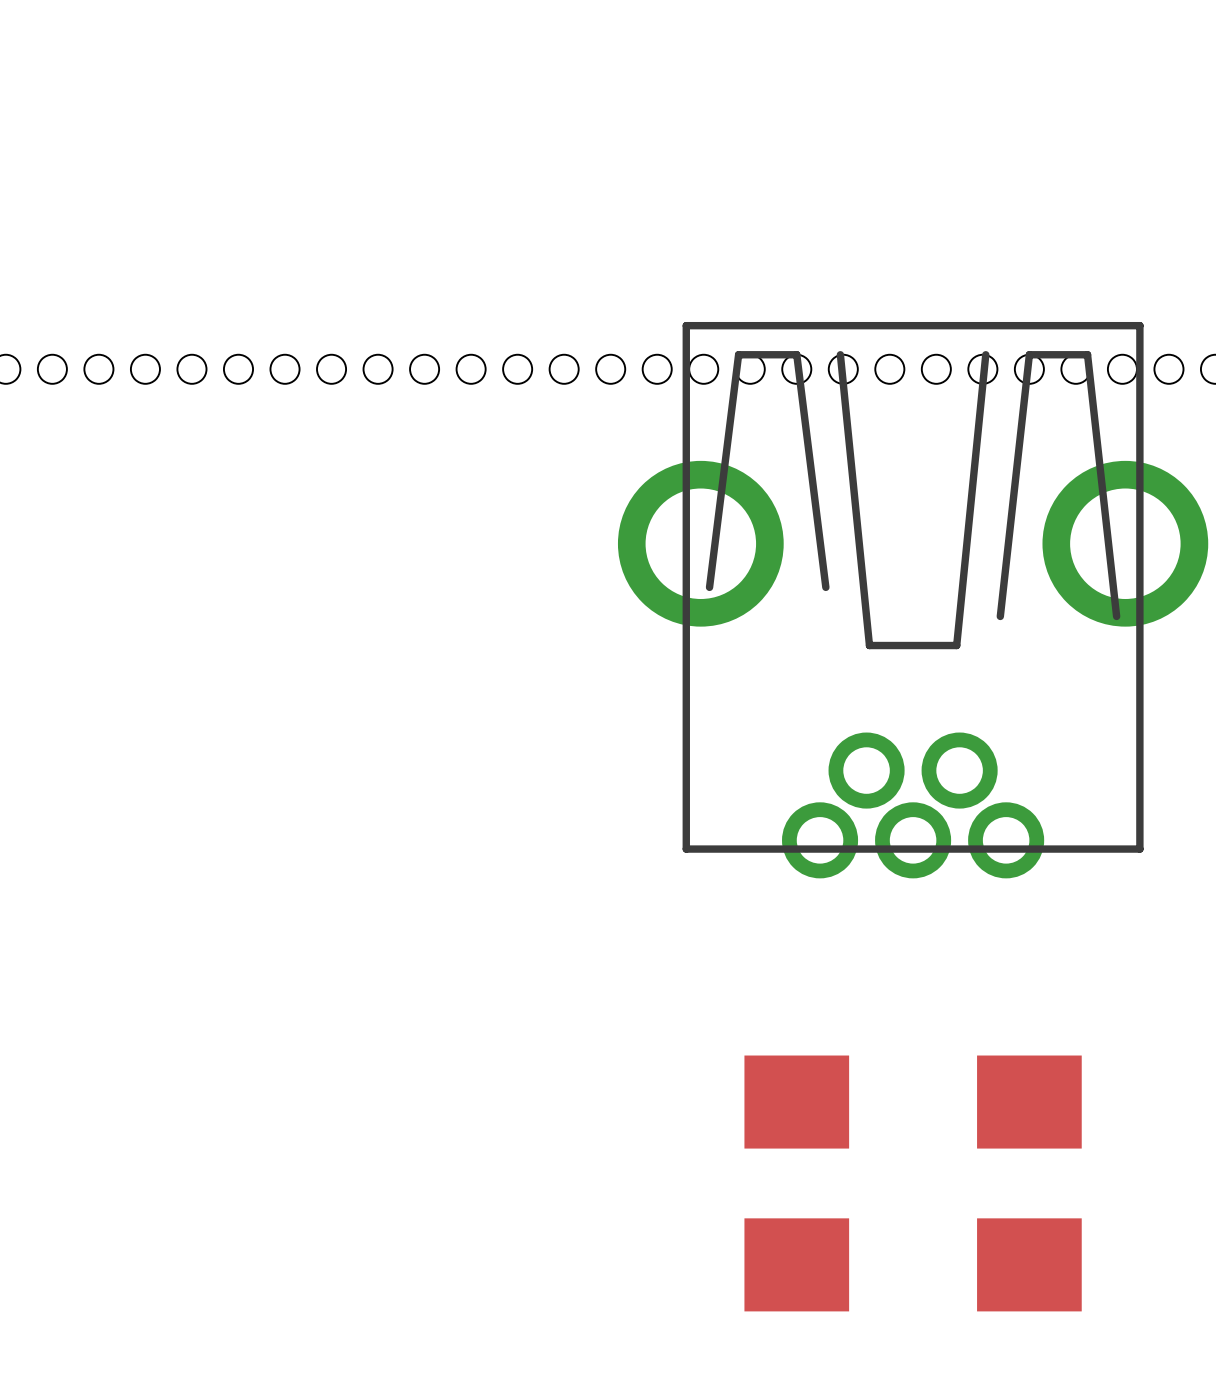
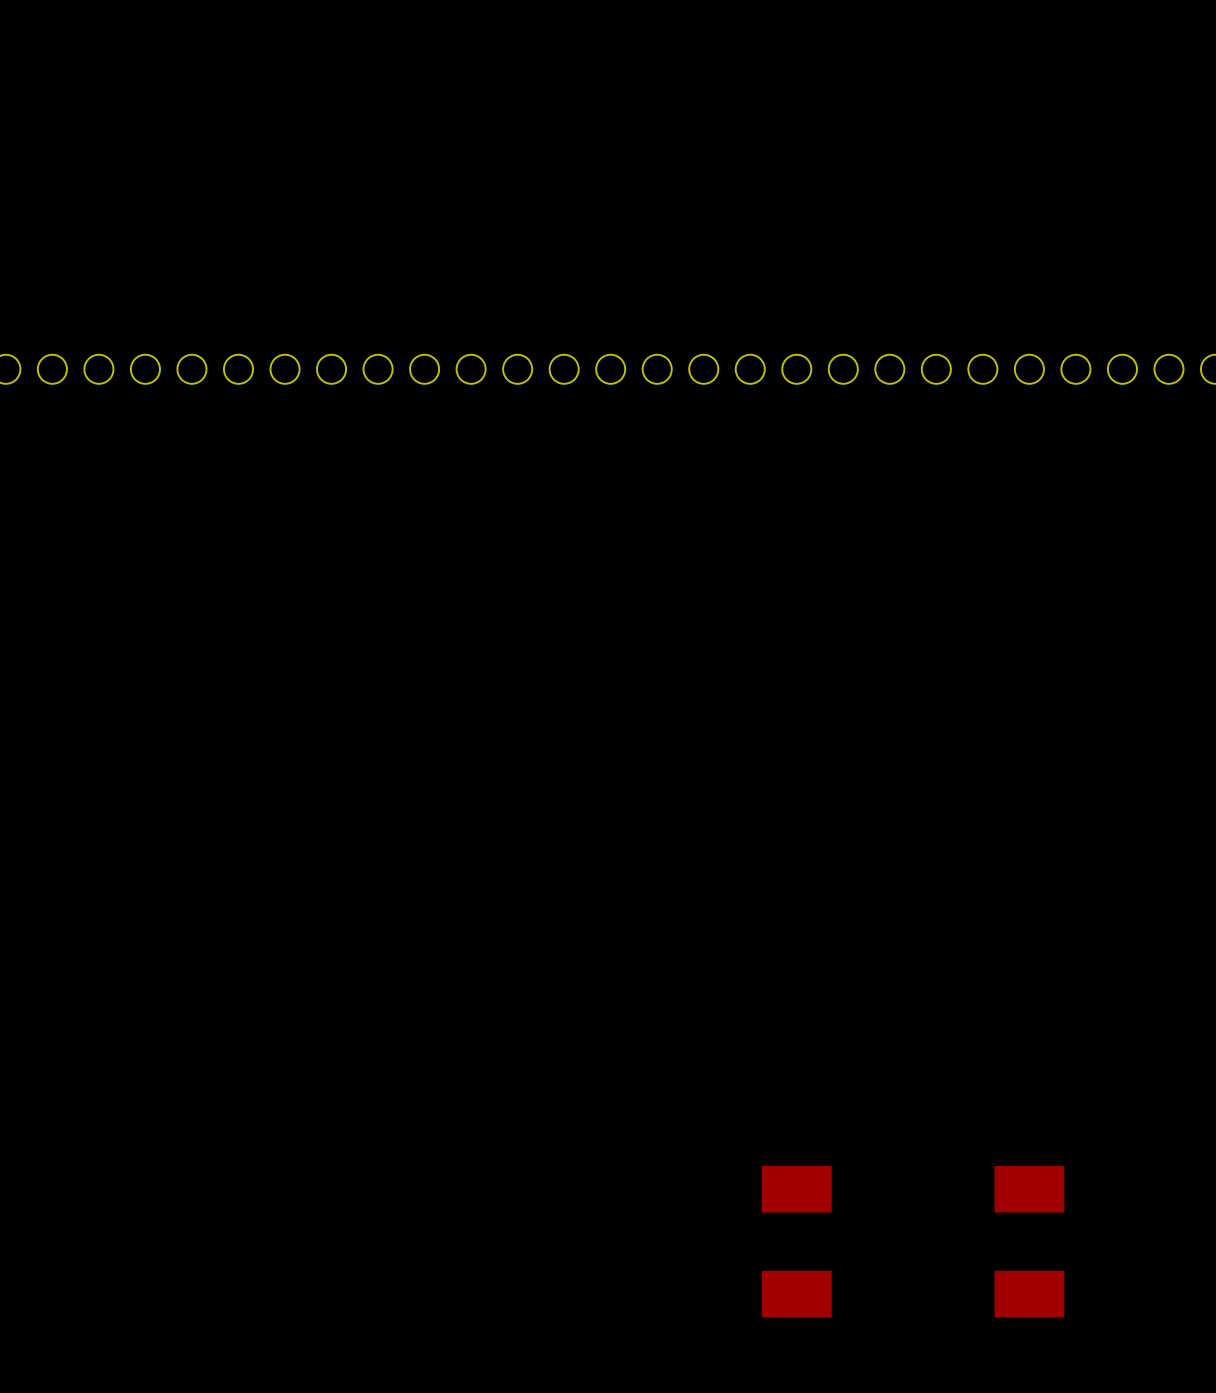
part: (913, 600) -> none
part footprint: [744, 1055, 850, 1312] -> [761, 1166, 832, 1318]
part footprint: [977, 1055, 1082, 1312] -> [994, 1166, 1065, 1318]

